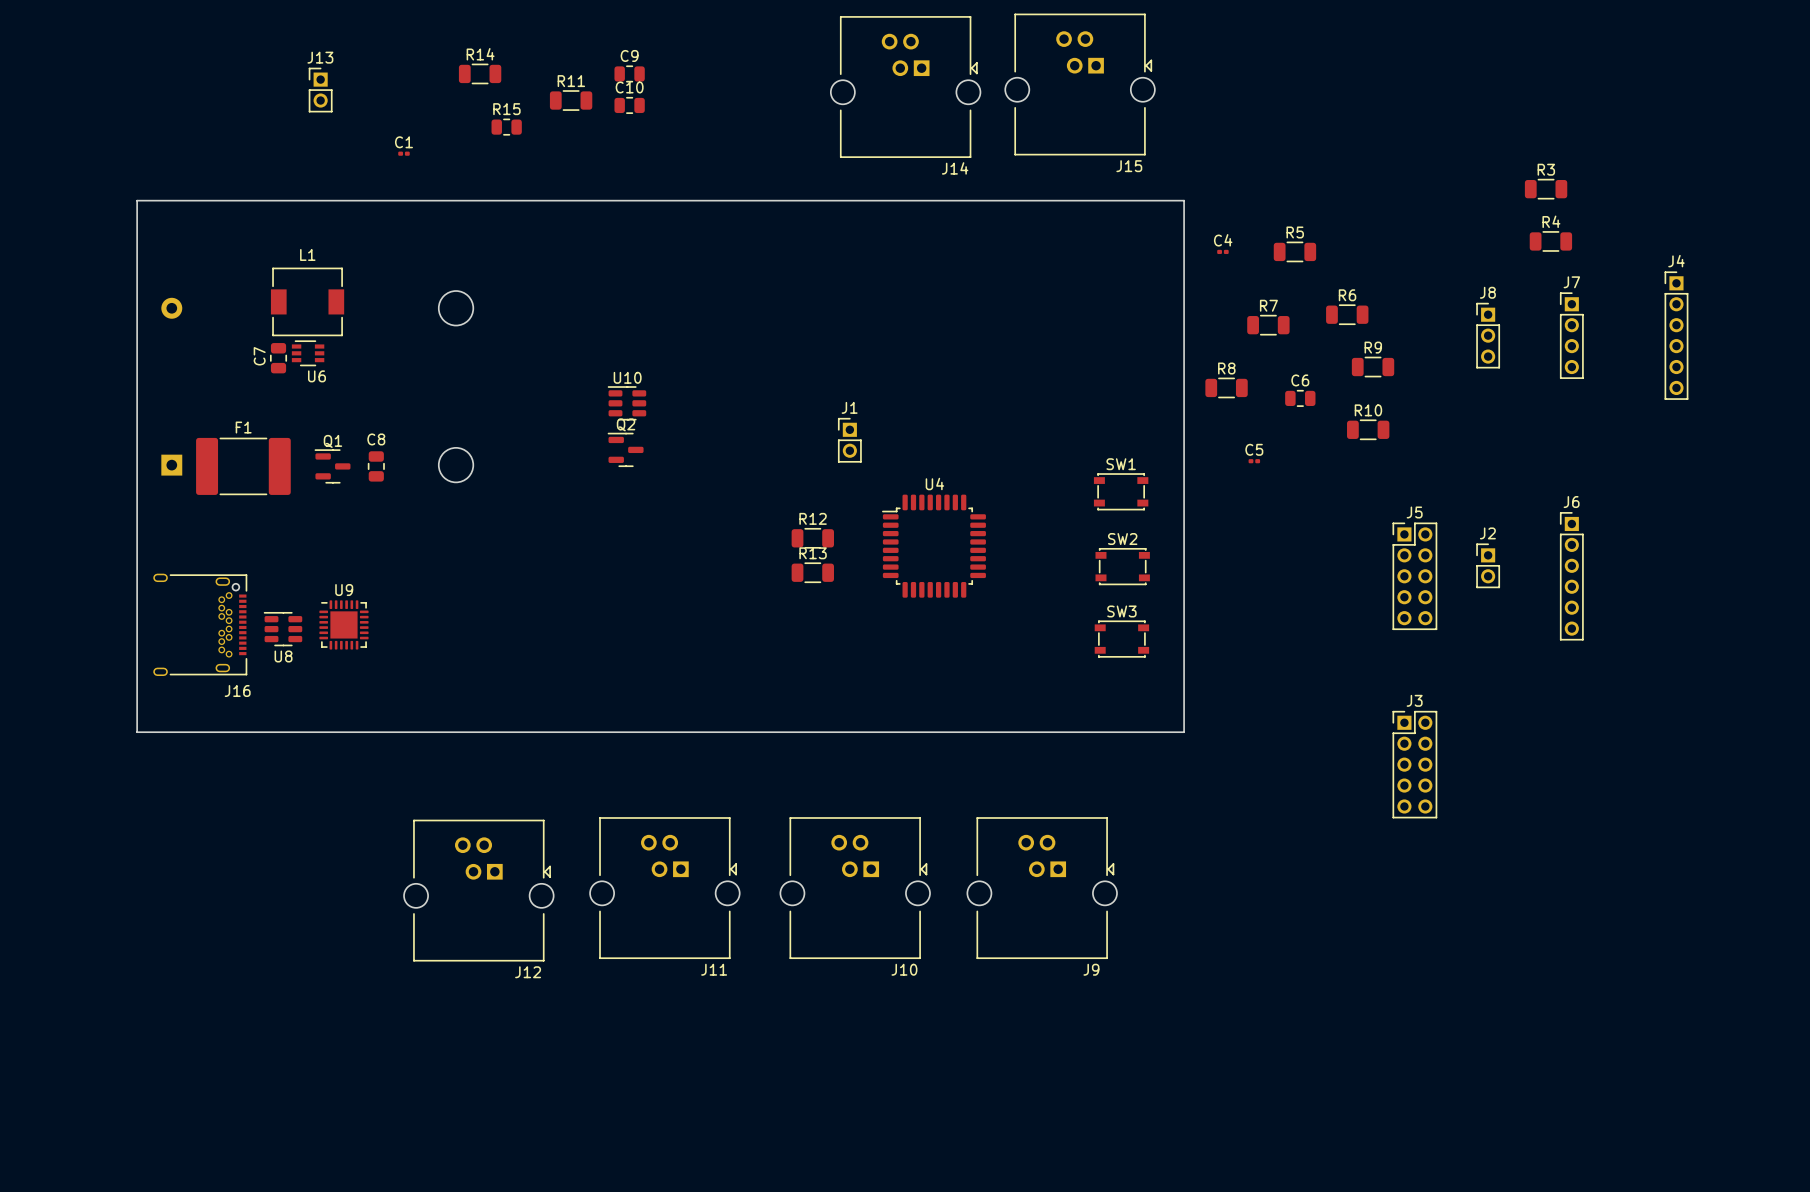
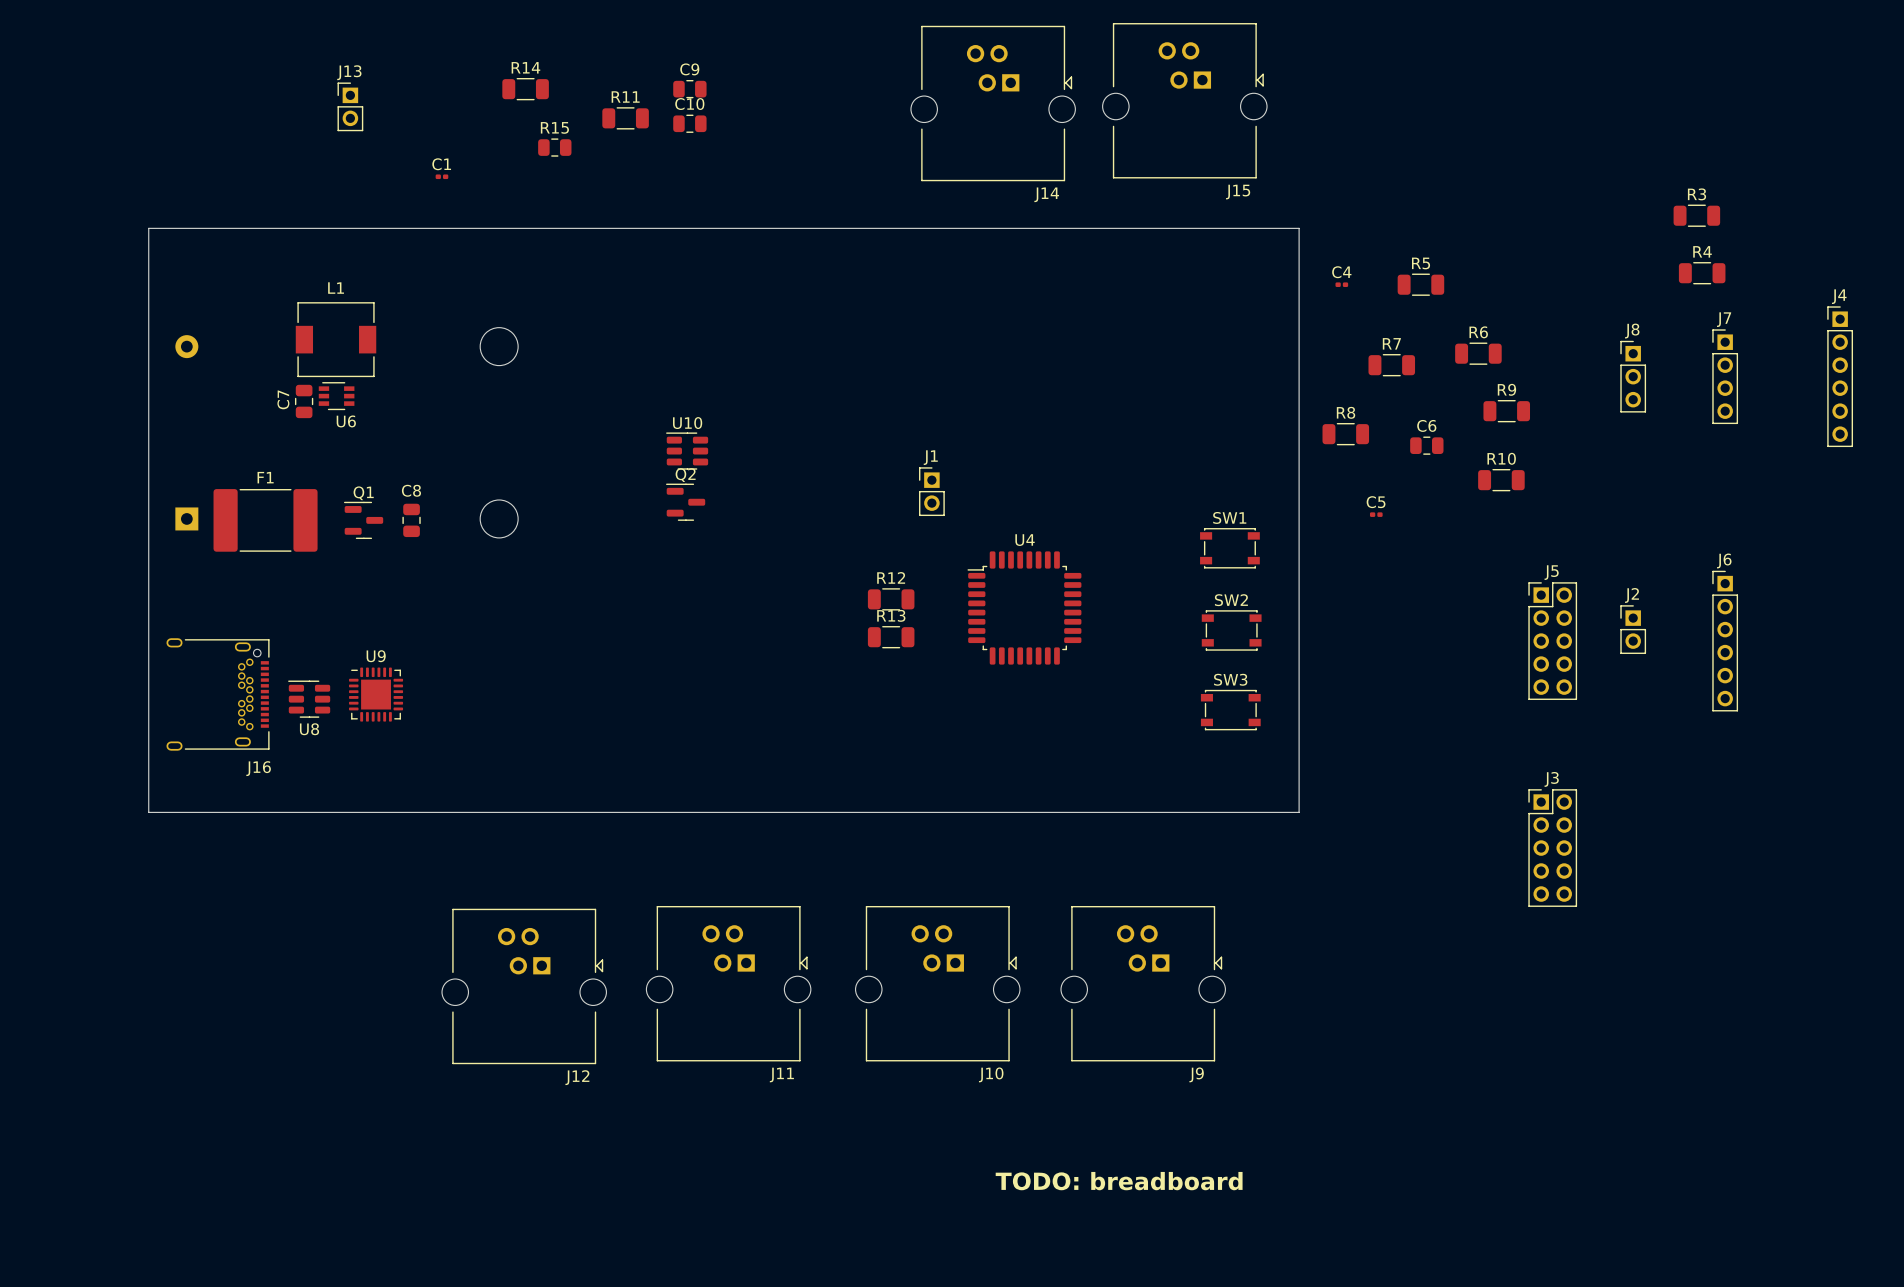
text: none -> TODO: breadboard (1119, 1181)

